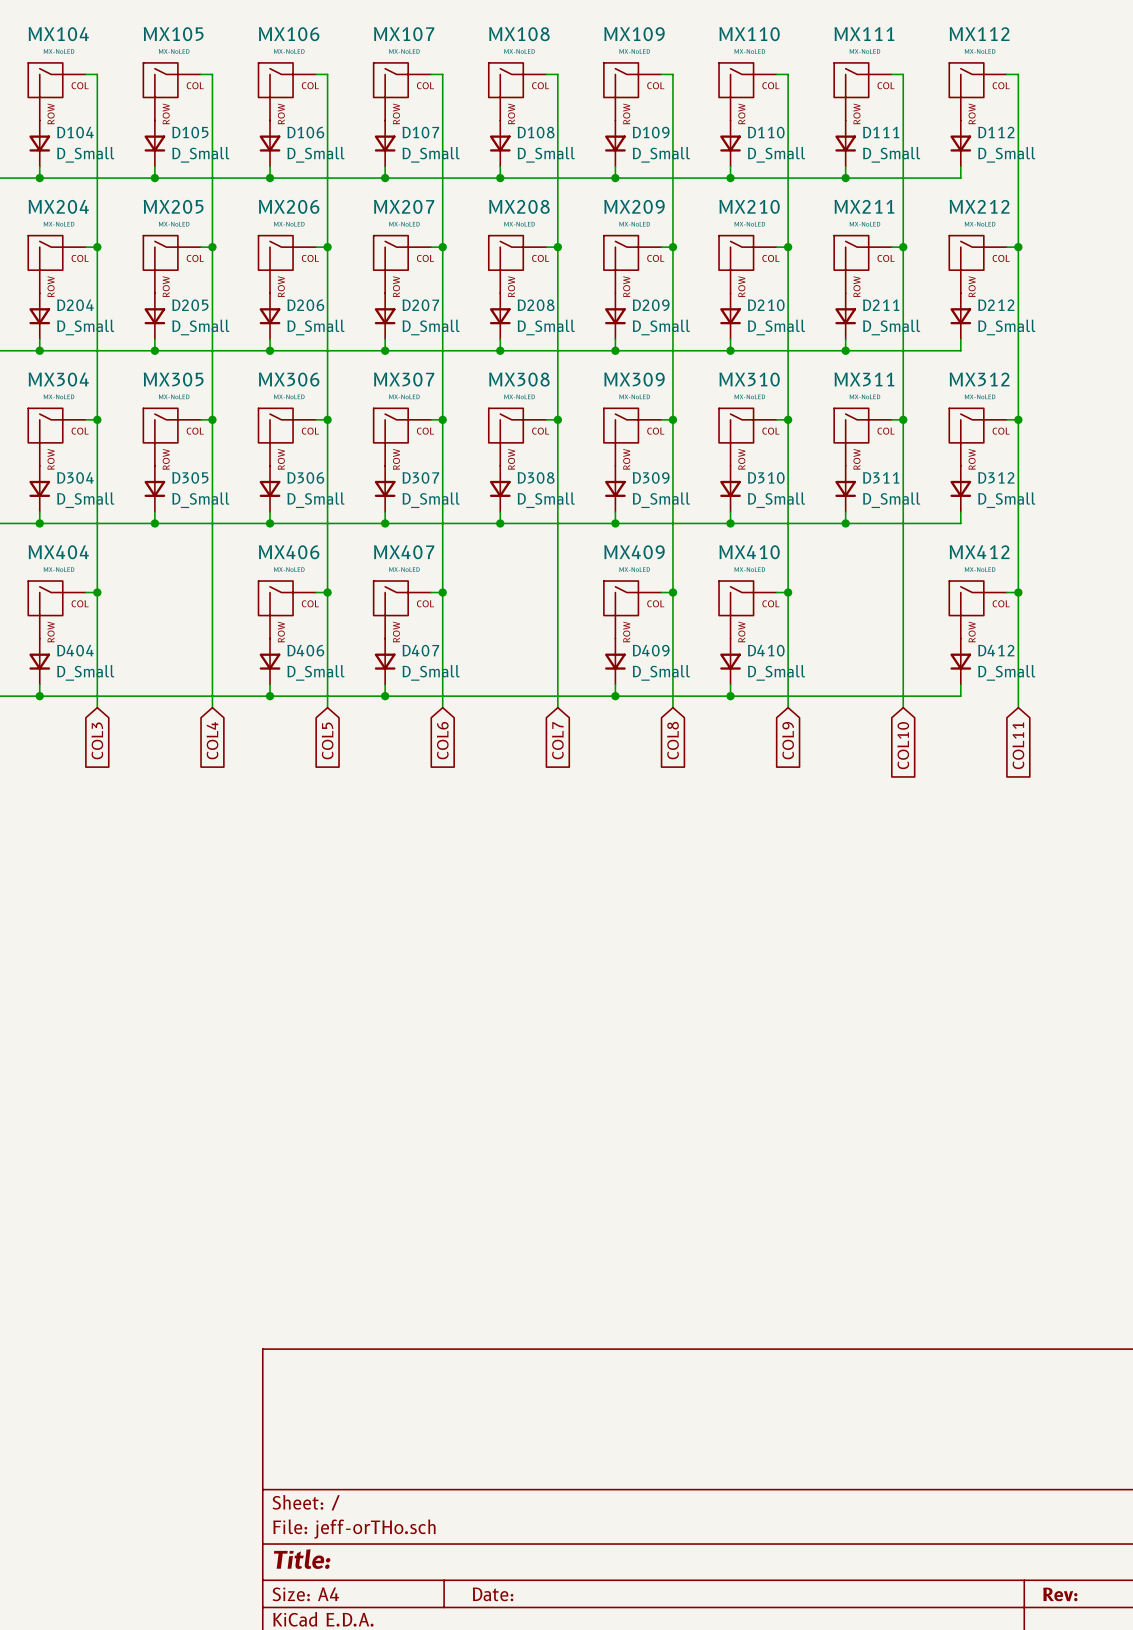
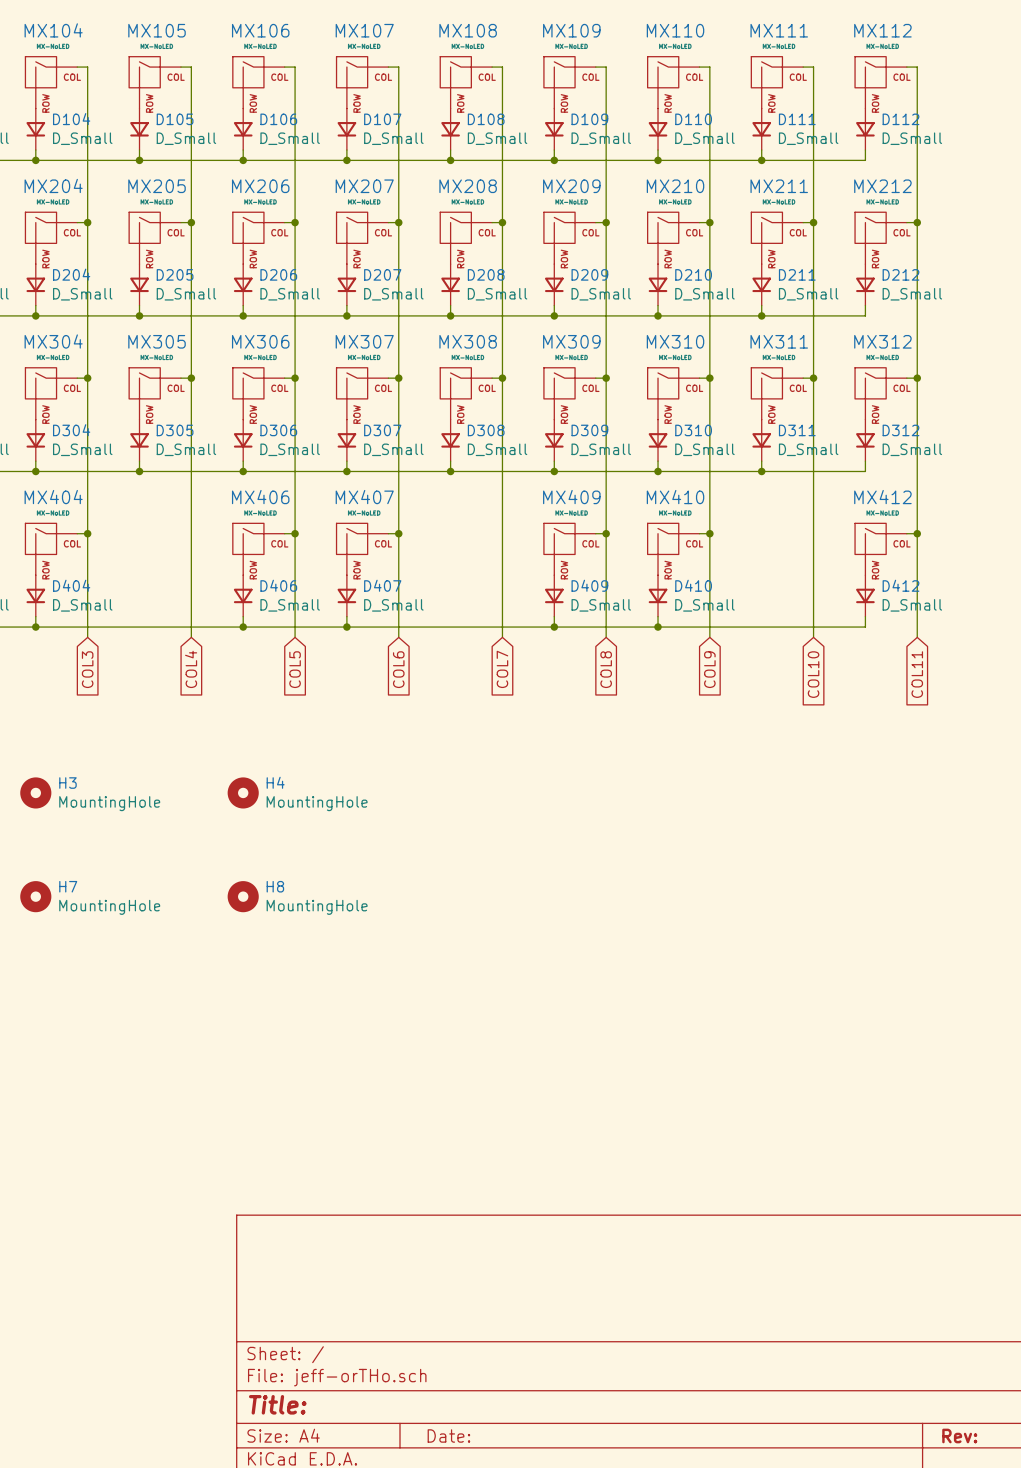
H3: none -> MountingHole (35, 792)
H4: none -> MountingHole (243, 792)
H7: none -> MountingHole (35, 896)
H8: none -> MountingHole (243, 896)

